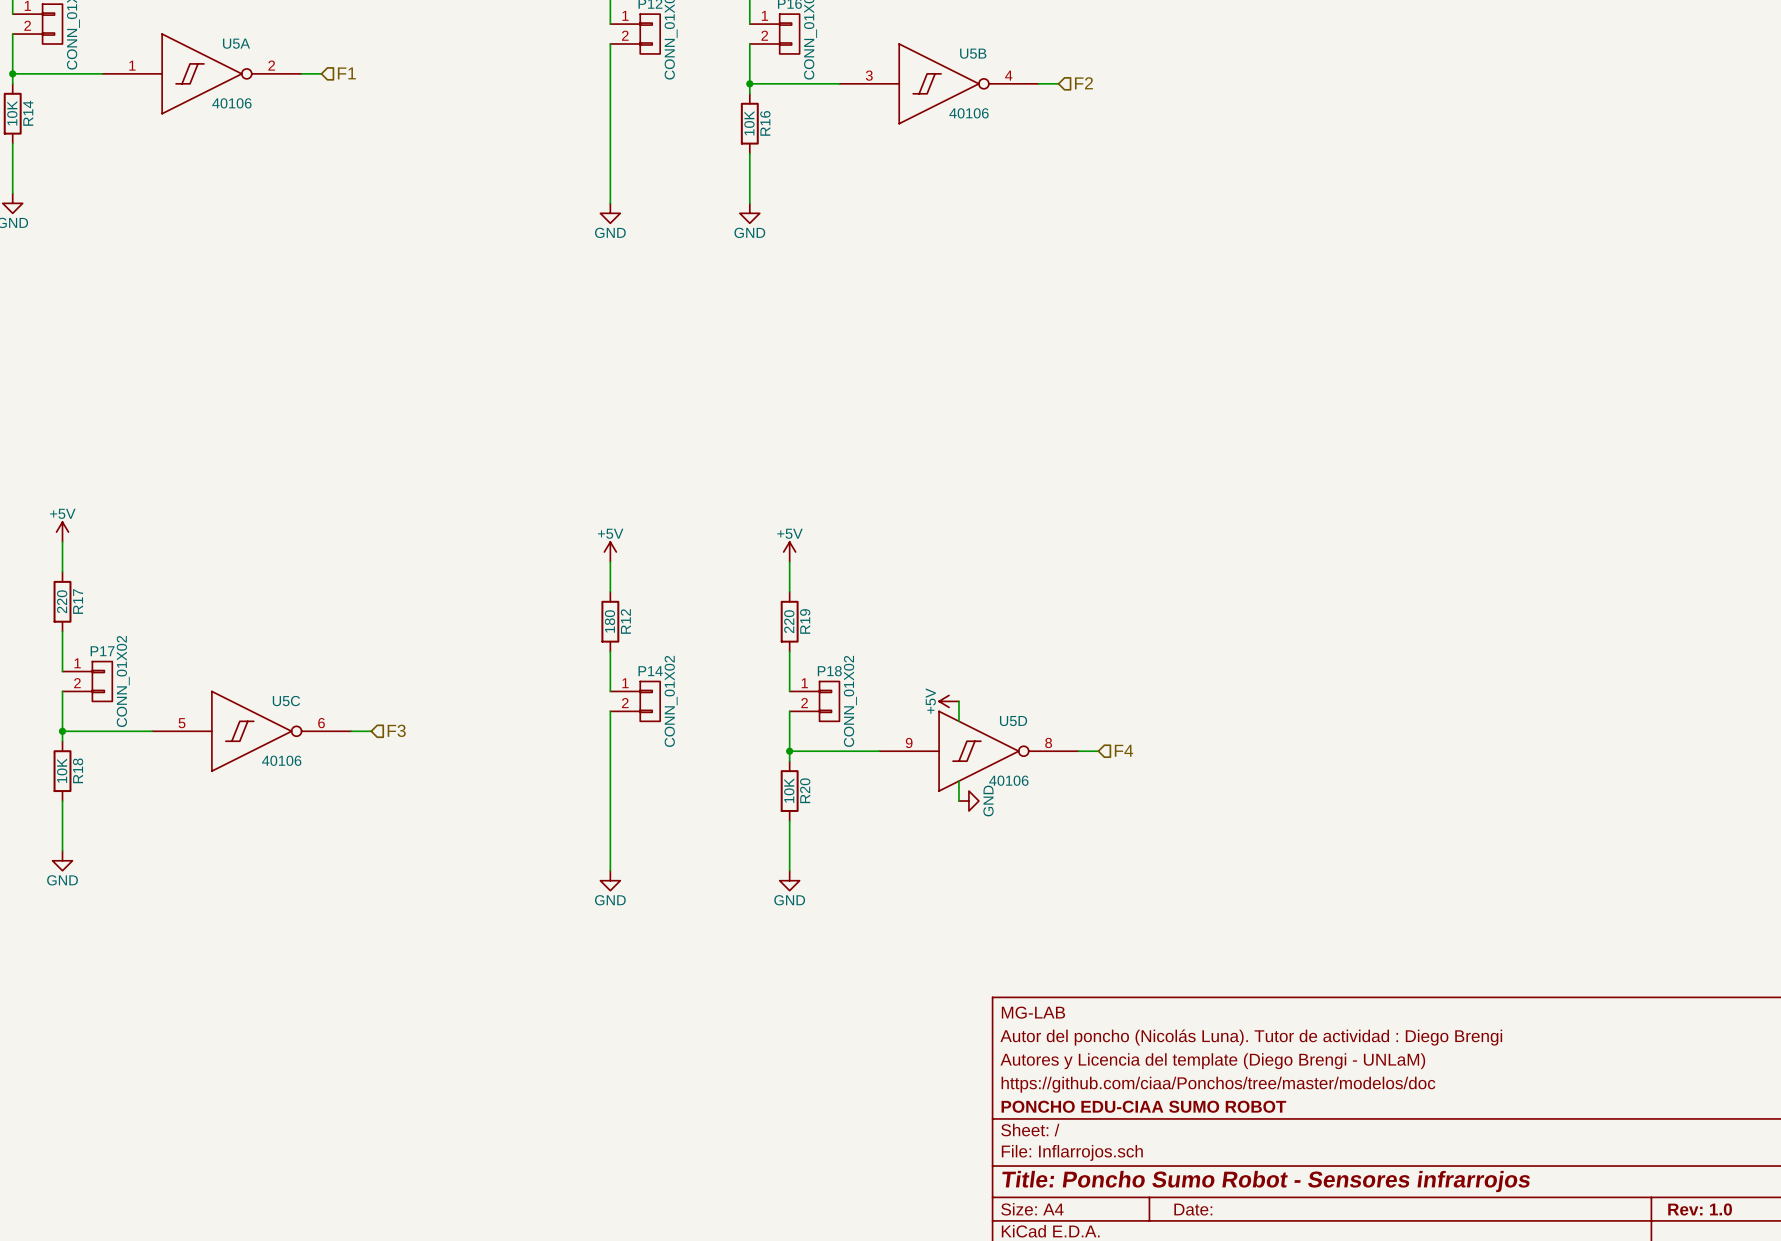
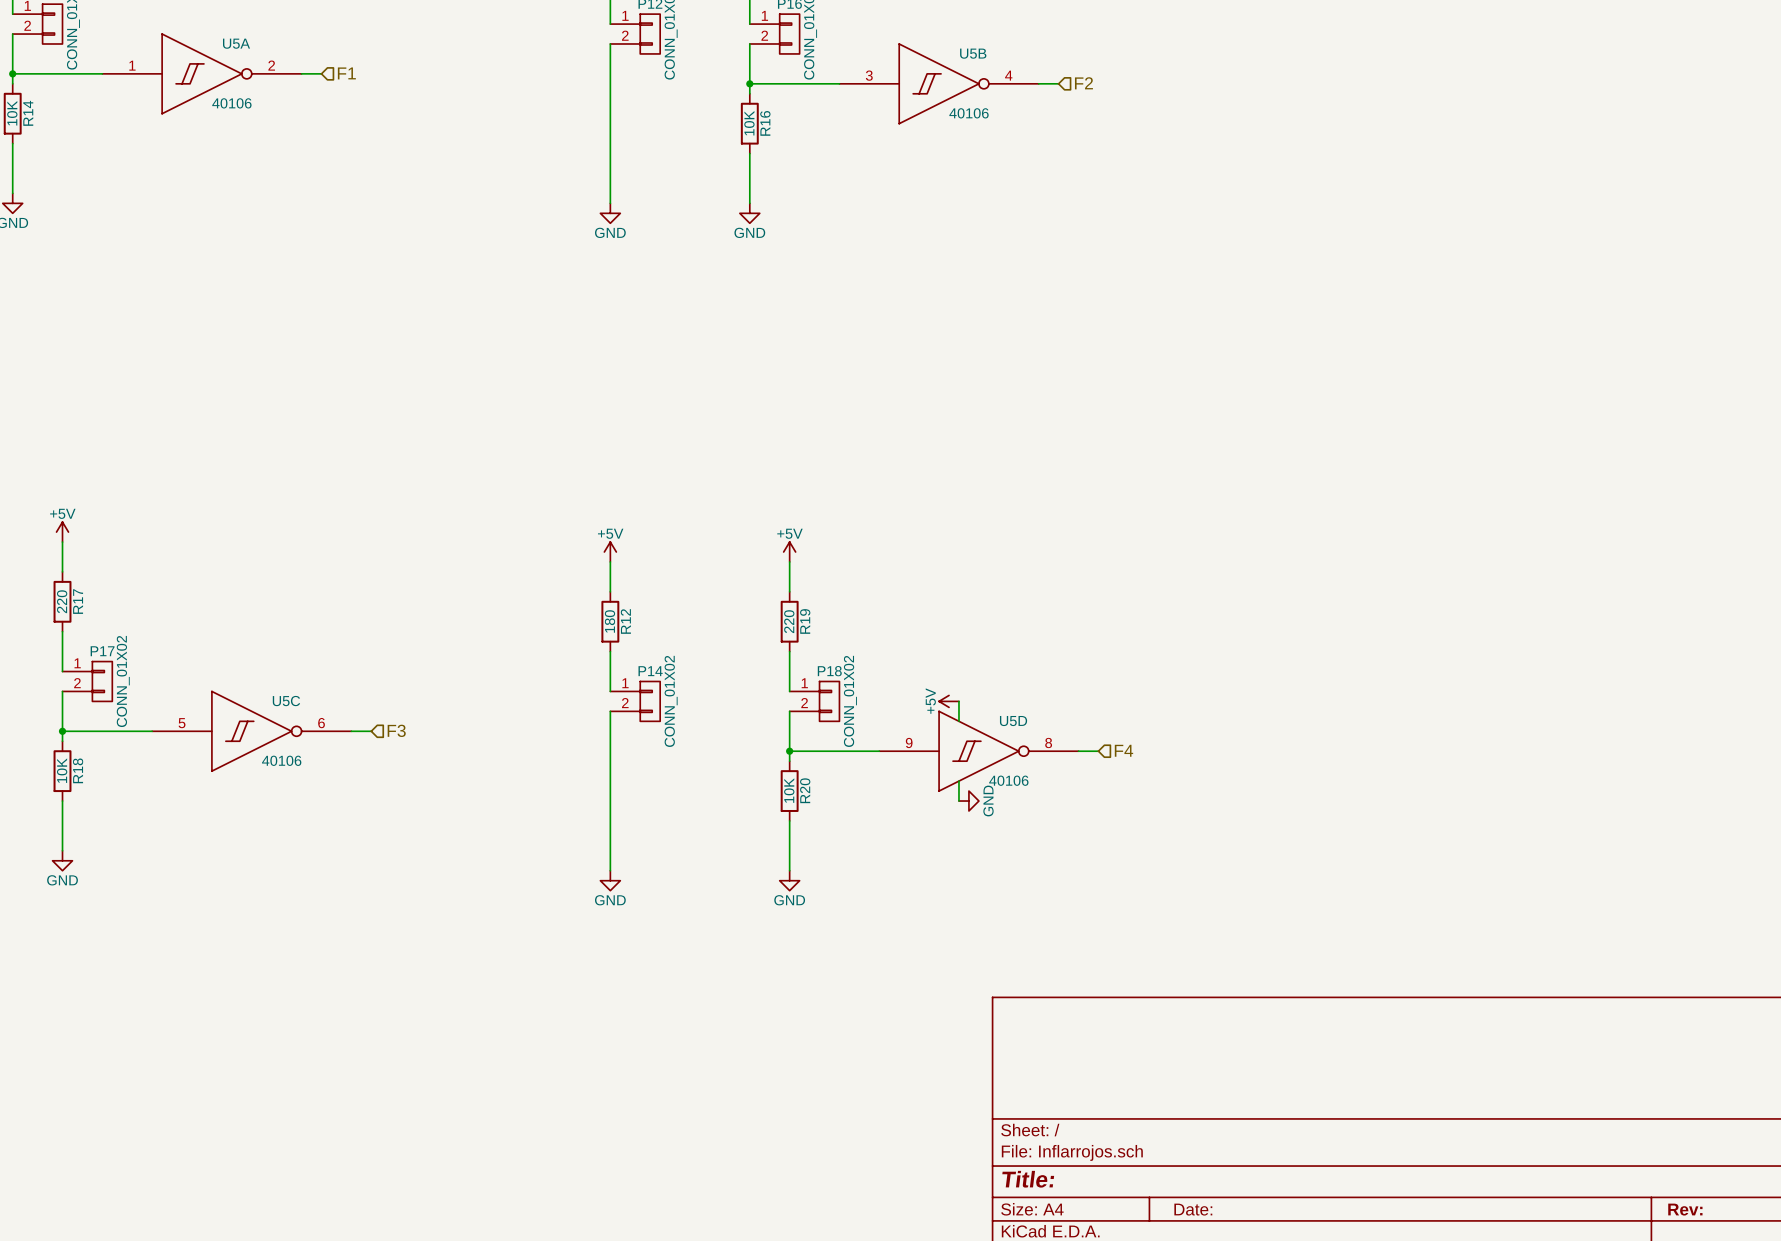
title block: MG-LAB (1033, 1012) -> none
title block: Autor del poncho (Nicolás Luna). Tutor de actividad : Diego Brengi (1251, 1037) -> none
title block: Autores y Licencia del template (Diego Brengi - UNLaM) (1212, 1061) -> none
title block: https://github.com/ciaa/Ponchos/tree/master/modelos/doc (1218, 1084) -> none
title block: PONCHO EDU-CIAA SUMO ROBOT (1143, 1106) -> none
title block: Title: Poncho Sumo Robot - Sensores infrarrojos (1266, 1181) -> Title: (1028, 1179)
title block: Rev: 1.0 (1700, 1209) -> Rev: (1685, 1209)

